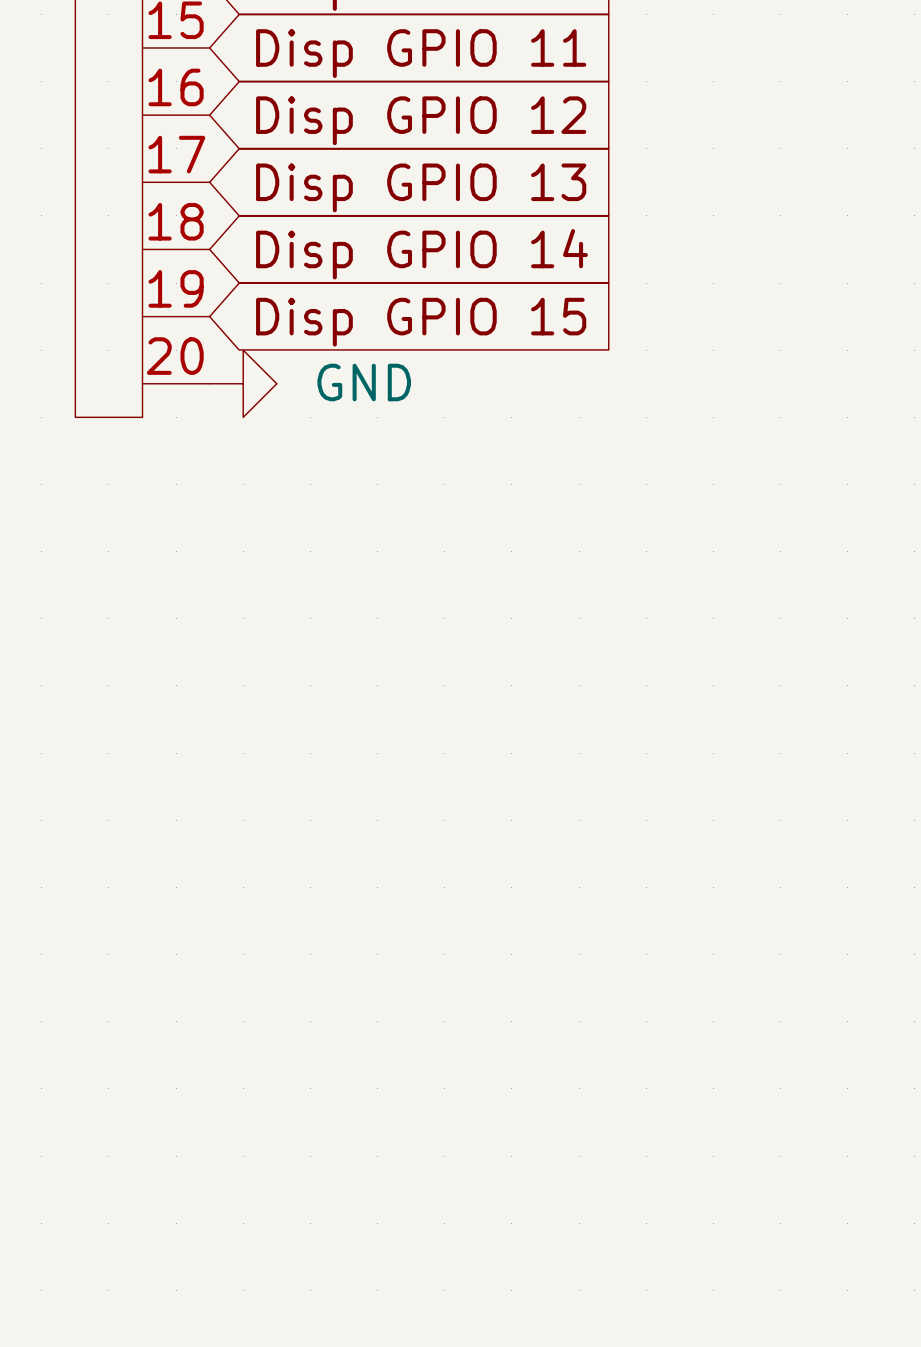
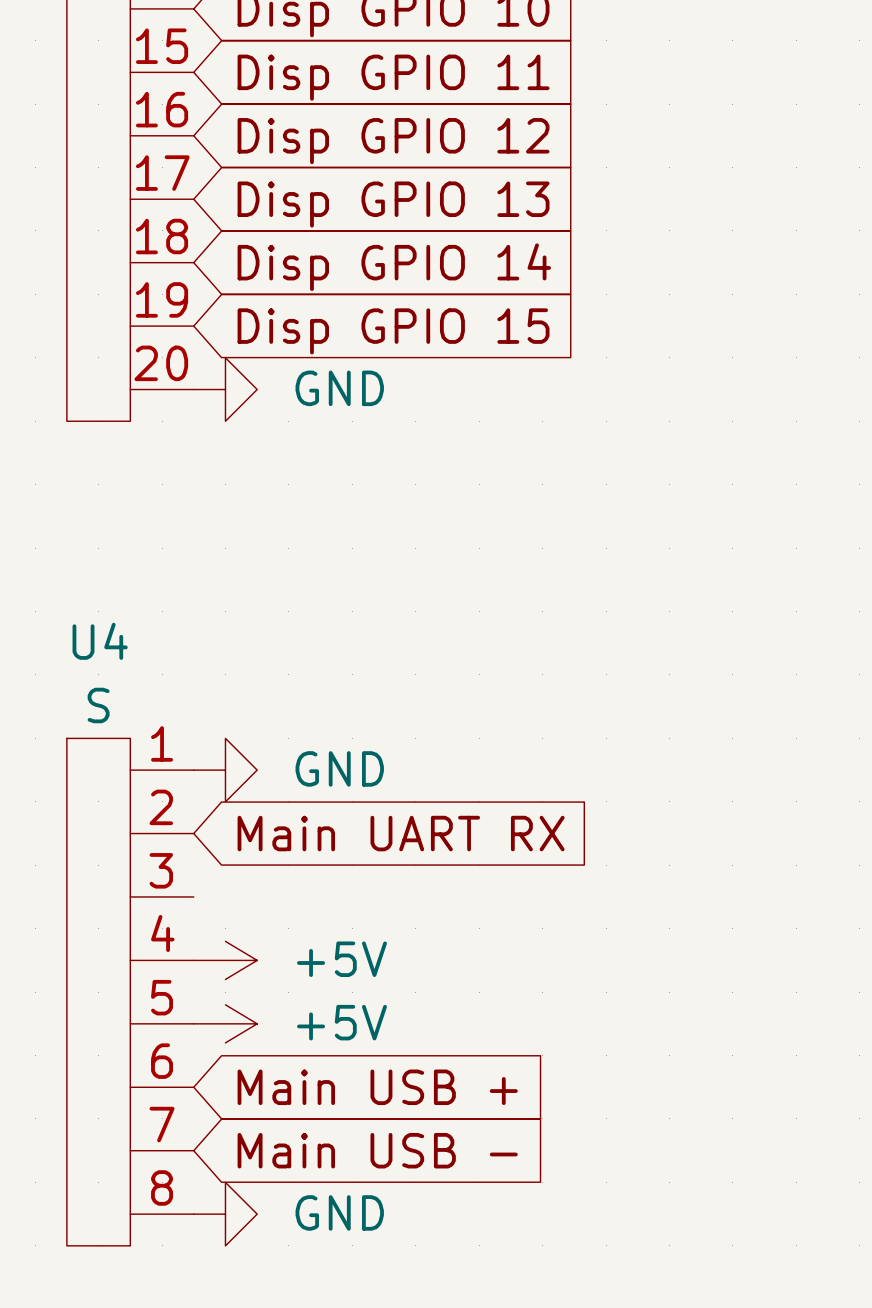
power symbol: none -> GND (225, 770)
global label: none -> Main UART RX (401, 833)
power symbol: none -> +5V (225, 960)
U4: none -> S (130, 992)
power symbol: none -> +5V (225, 1023)
global label: none -> Main USB + (377, 1087)
global label: none -> Main USB - (377, 1150)
power symbol: none -> GND (225, 1214)

